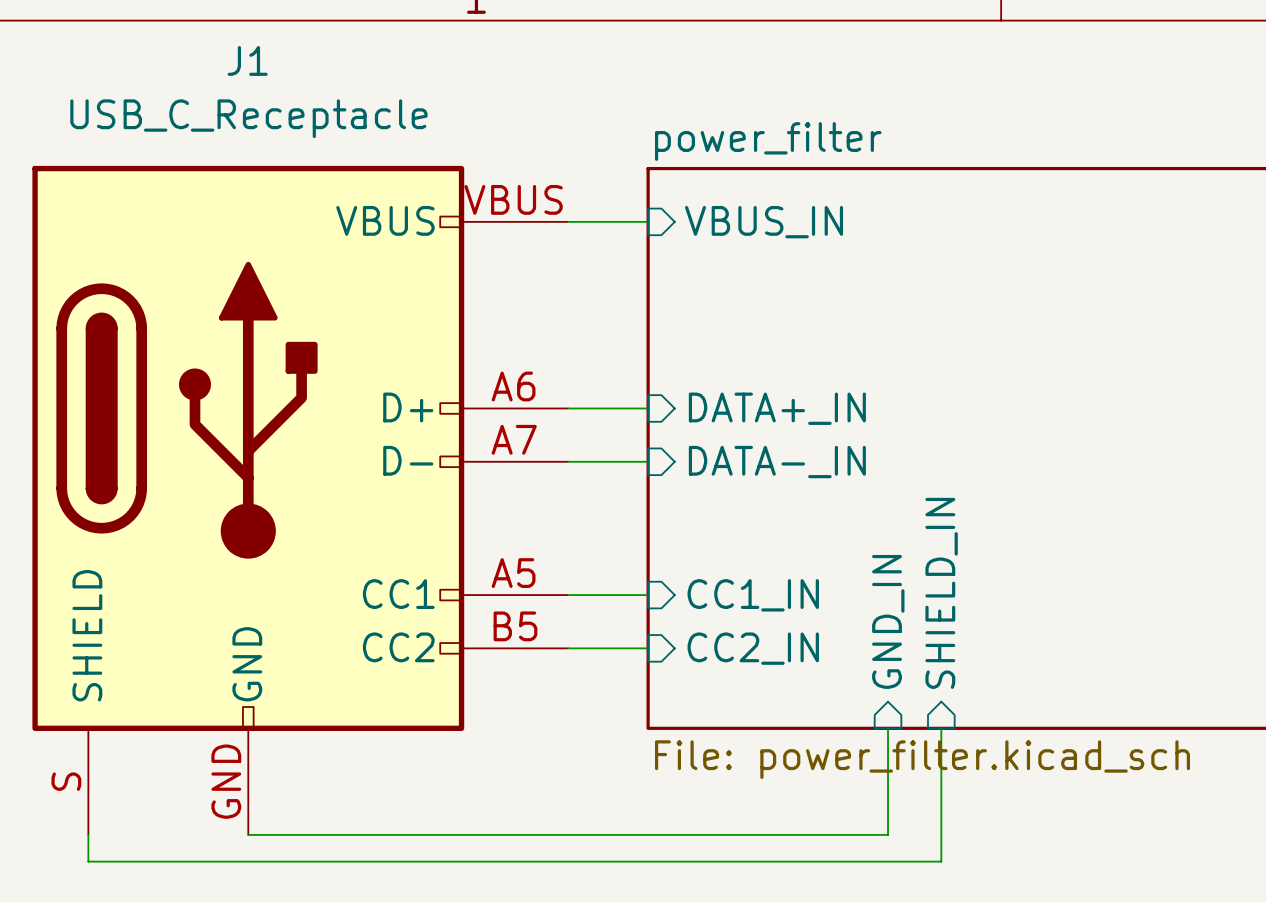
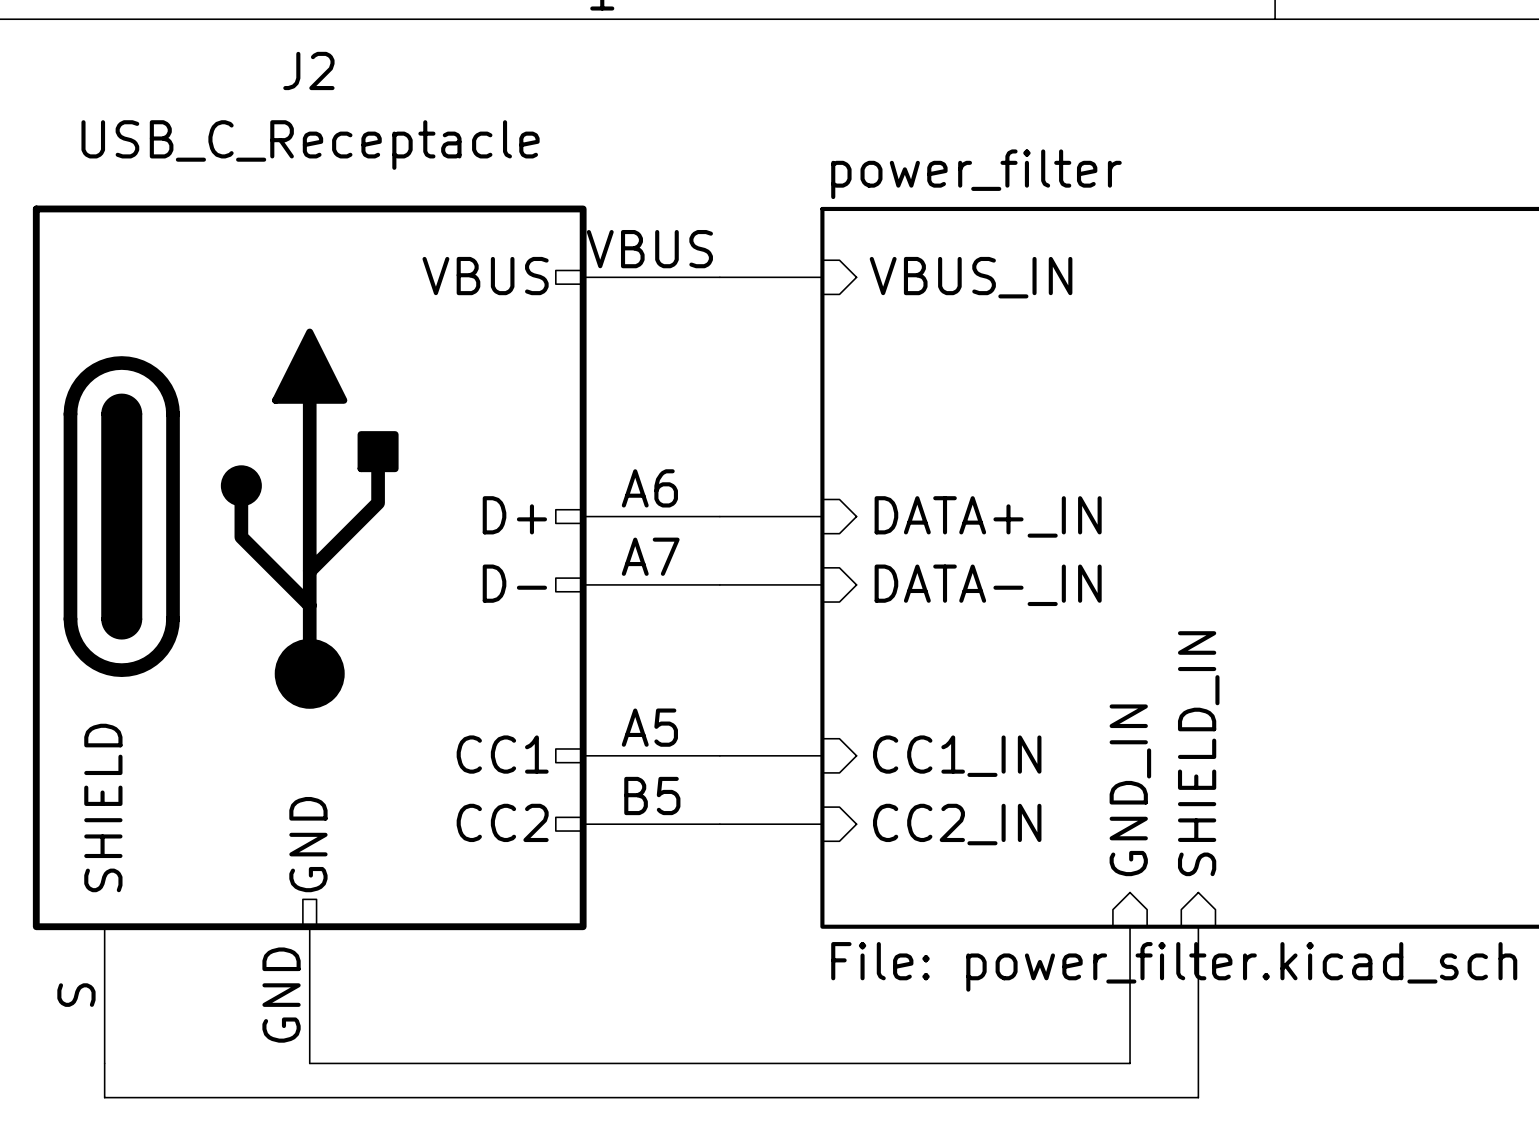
J1 name: J1 (247, 60) -> J2 (308, 70)

